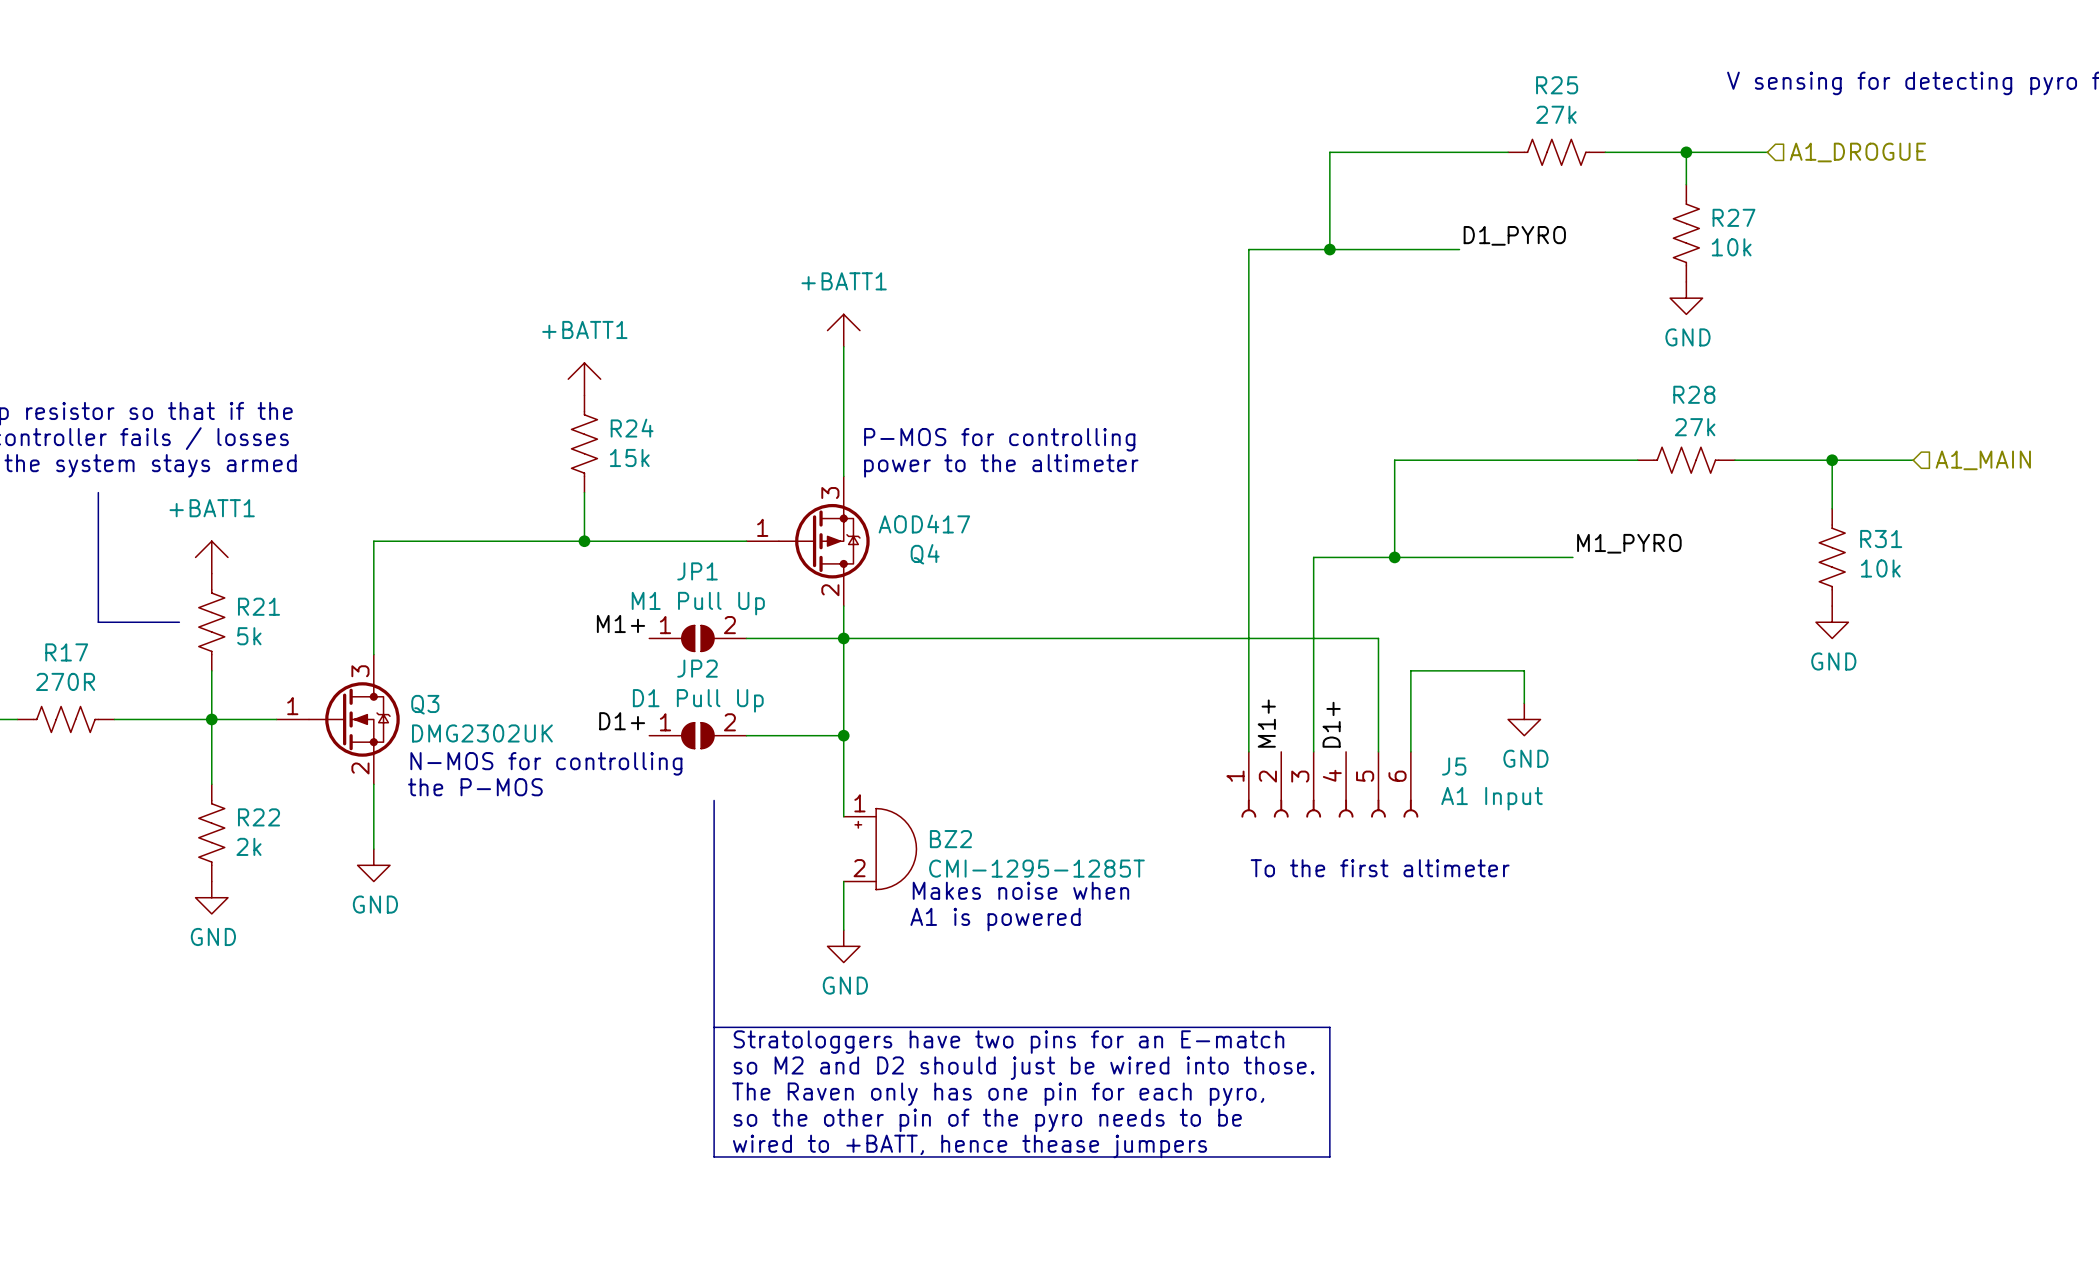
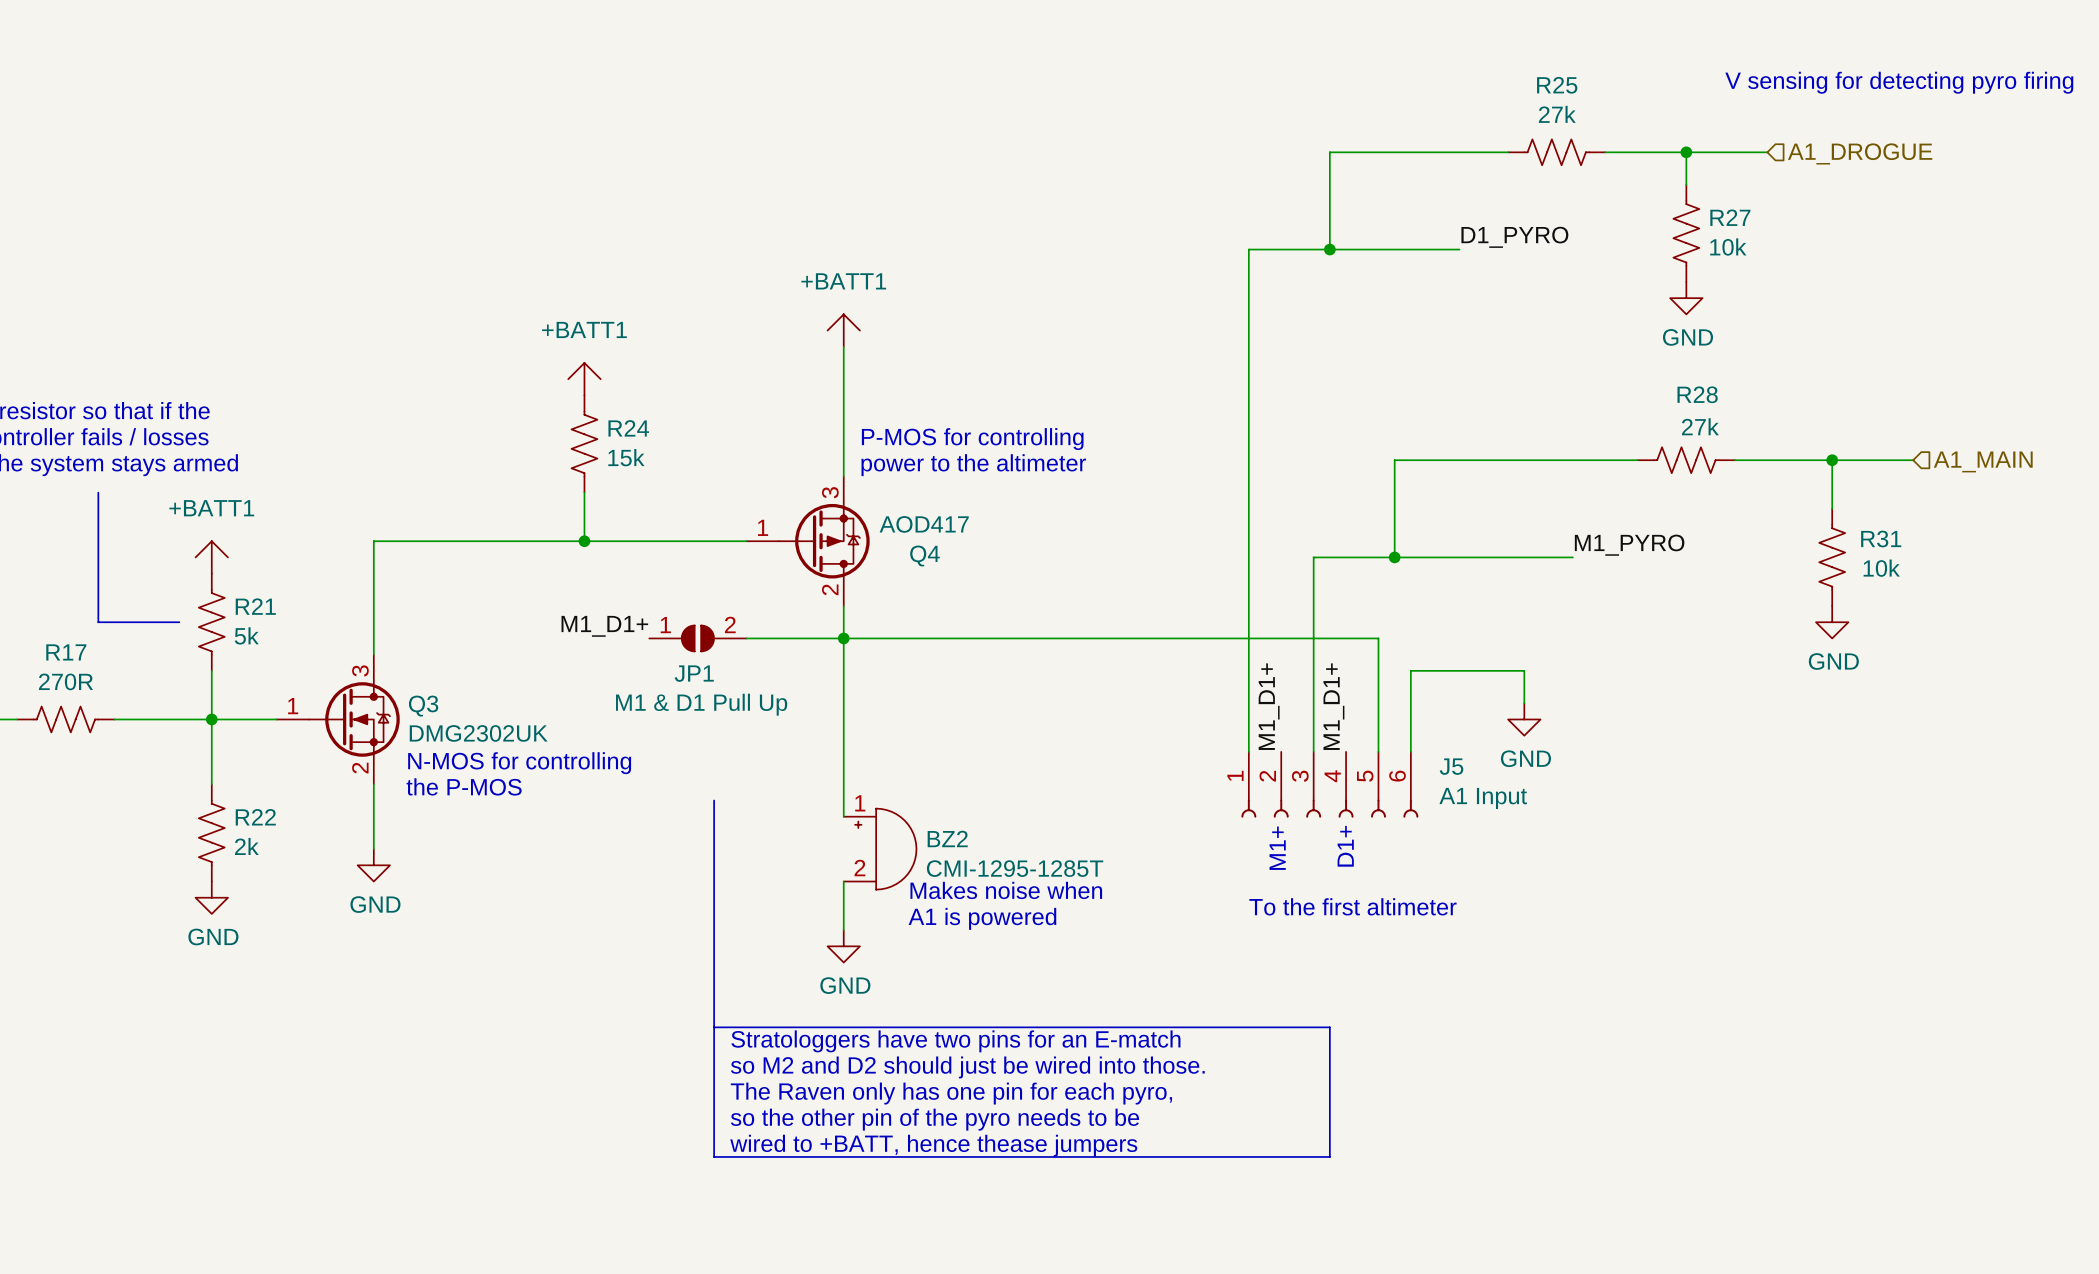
JP1 name position: JP1 (697, 571) -> JP1 (694, 673)
JP1 value: M1 Pull Up (698, 603) -> M1 & D1 Pull Up (701, 704)
label: M1+ (621, 623) -> M1_D1+ (604, 626)
label: D1+ (622, 721) -> none
label: M1+ (1266, 723) -> M1_D1+ (1269, 706)
label: D1+ (1331, 724) -> M1_D1+ (1333, 706)
JP2: D1 Pull Up (697, 735) -> none
wire: (746, 735) (843, 735) -> none
junction: (843, 735) -> none
text: none -> D1+ (1345, 846)
text: none -> M1+ (1277, 848)
text position: To the first altimeter (1380, 868) -> To the first altimeter (1352, 906)

